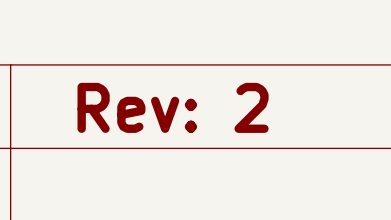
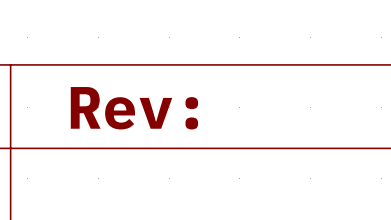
title block: Rev: 2 (173, 107) -> Rev: (134, 108)

